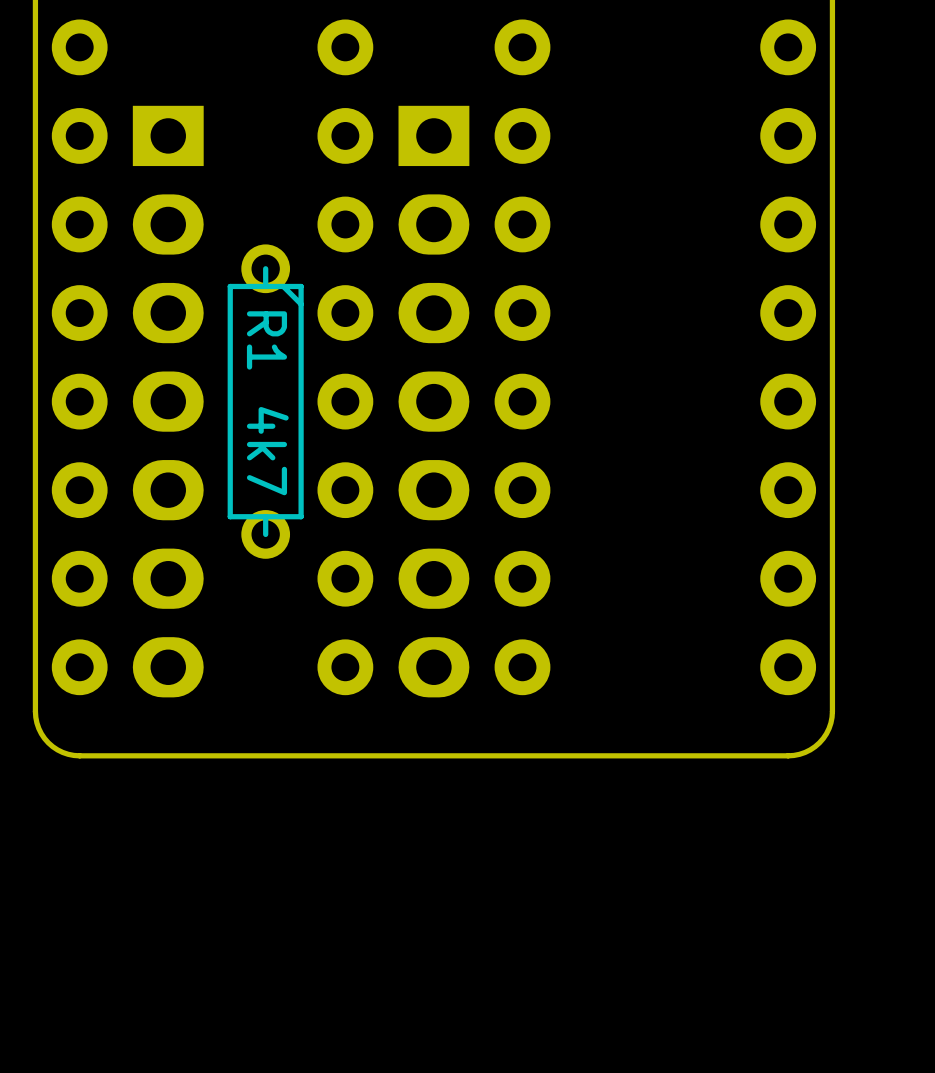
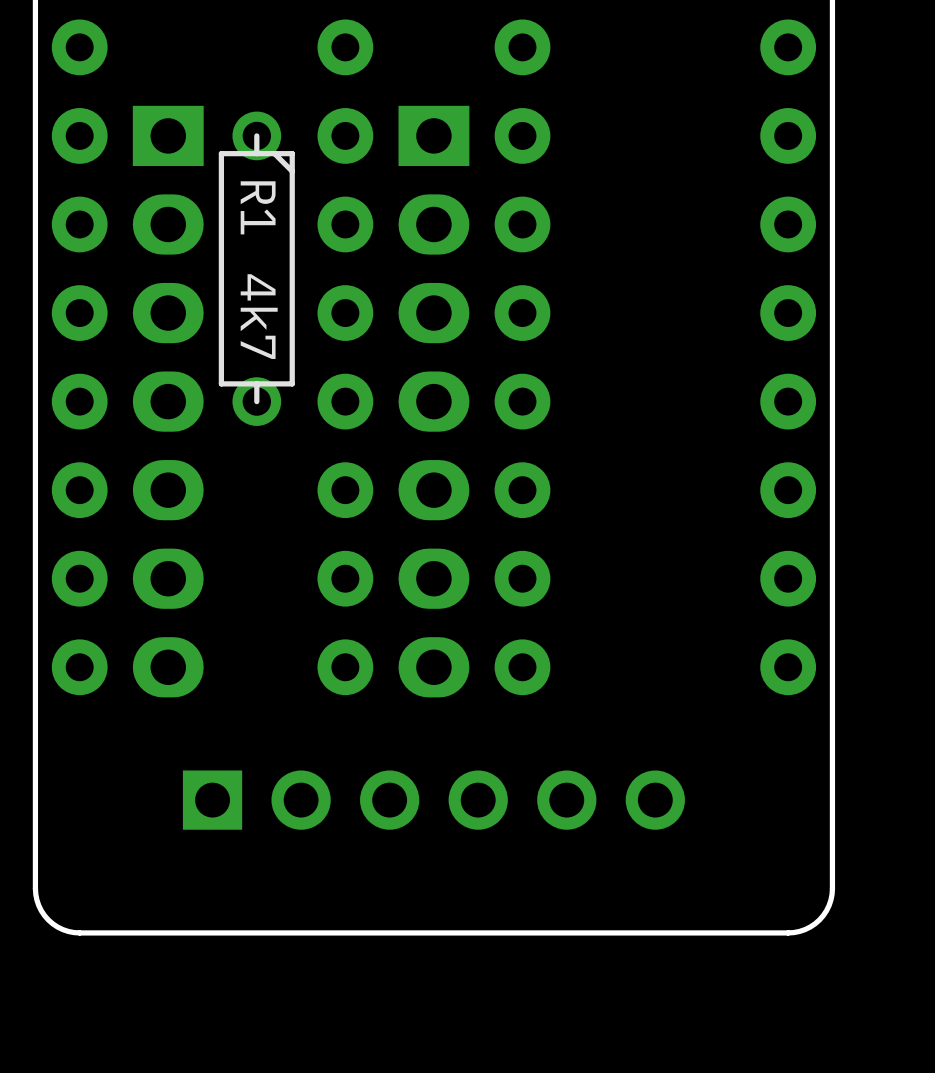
R1 position: (265, 401) -> (256, 268)
board edge: (832, 711) (829, 728) (819, 742) (805, 752) (788, 755) (79, 755) (62, 752) (48, 742) (38, 728) (35, 711) -> (832, 711) (830, 900) (823, 915) (815, 923) (805, 929) (788, 932) (68, 931) (57, 927) (44, 915) (38, 905) (35, 894) (35, 711)
part: none -> (433, 800)

